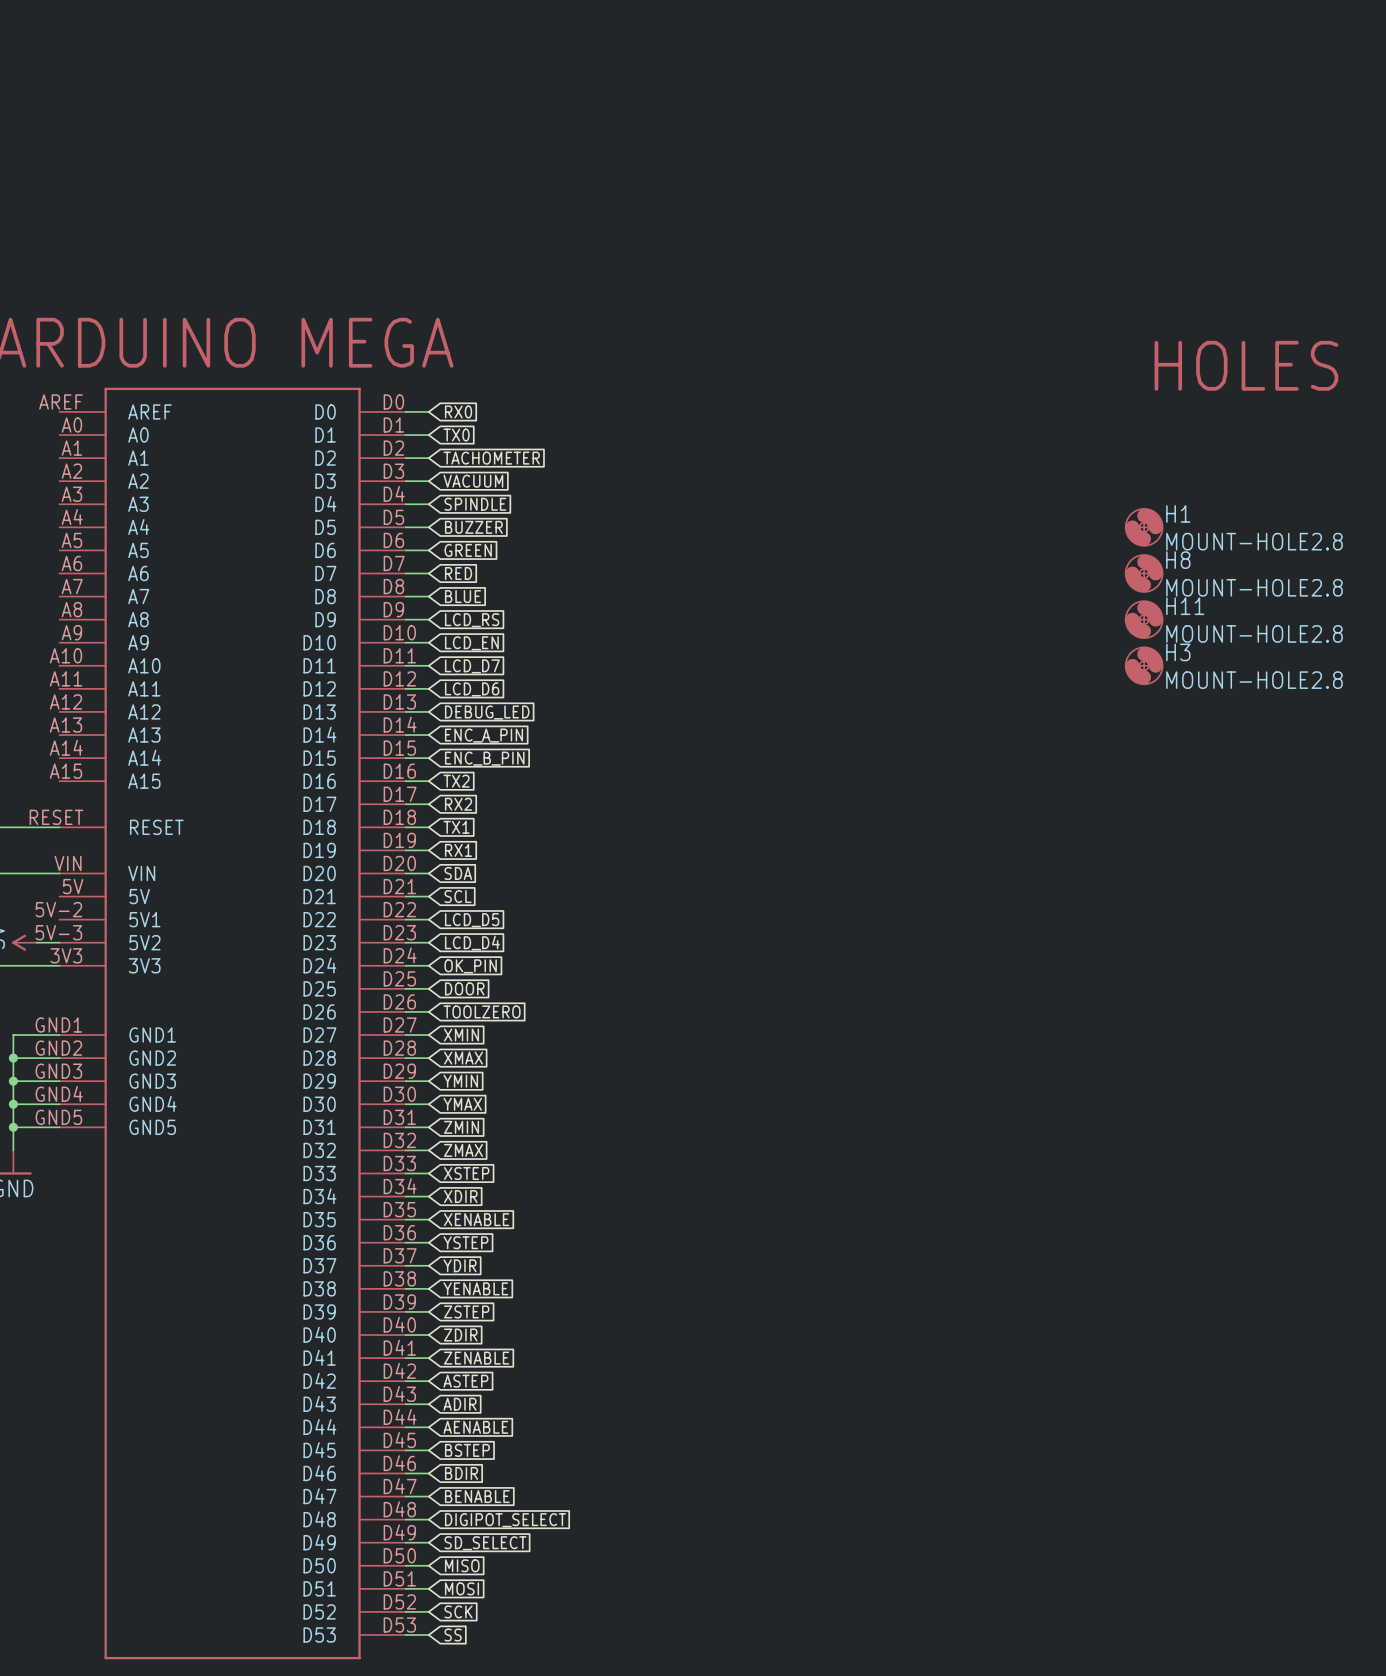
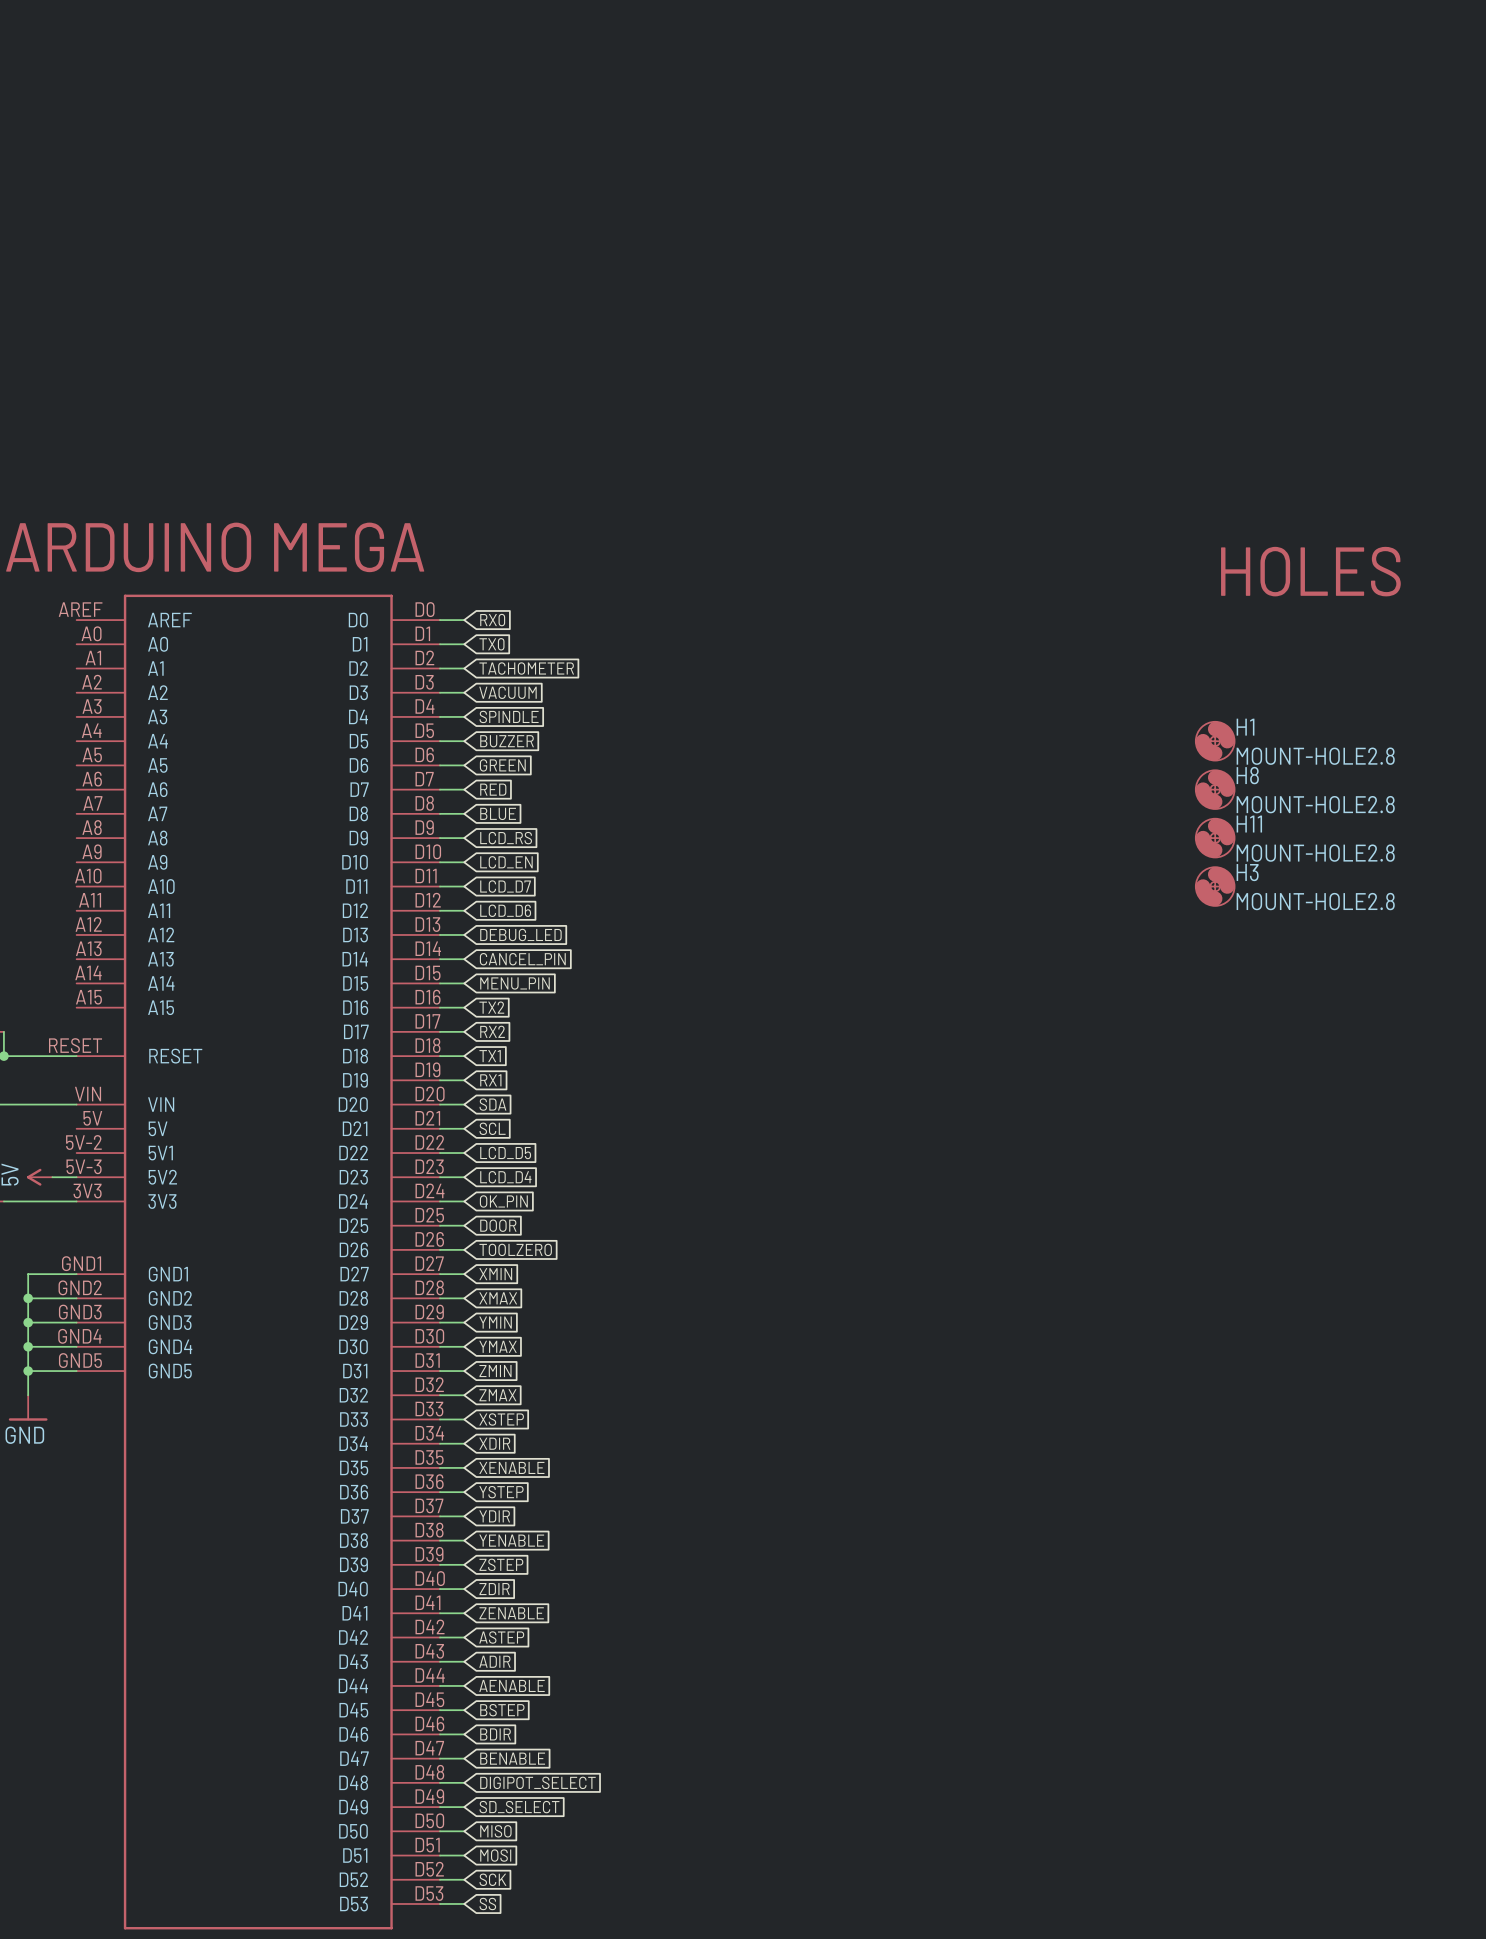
global label: ENC_A_PIN (484, 735) -> CANCEL_PIN (522, 959)
global label: ENC_B_PIN (484, 758) -> MENU_PIN (515, 983)

